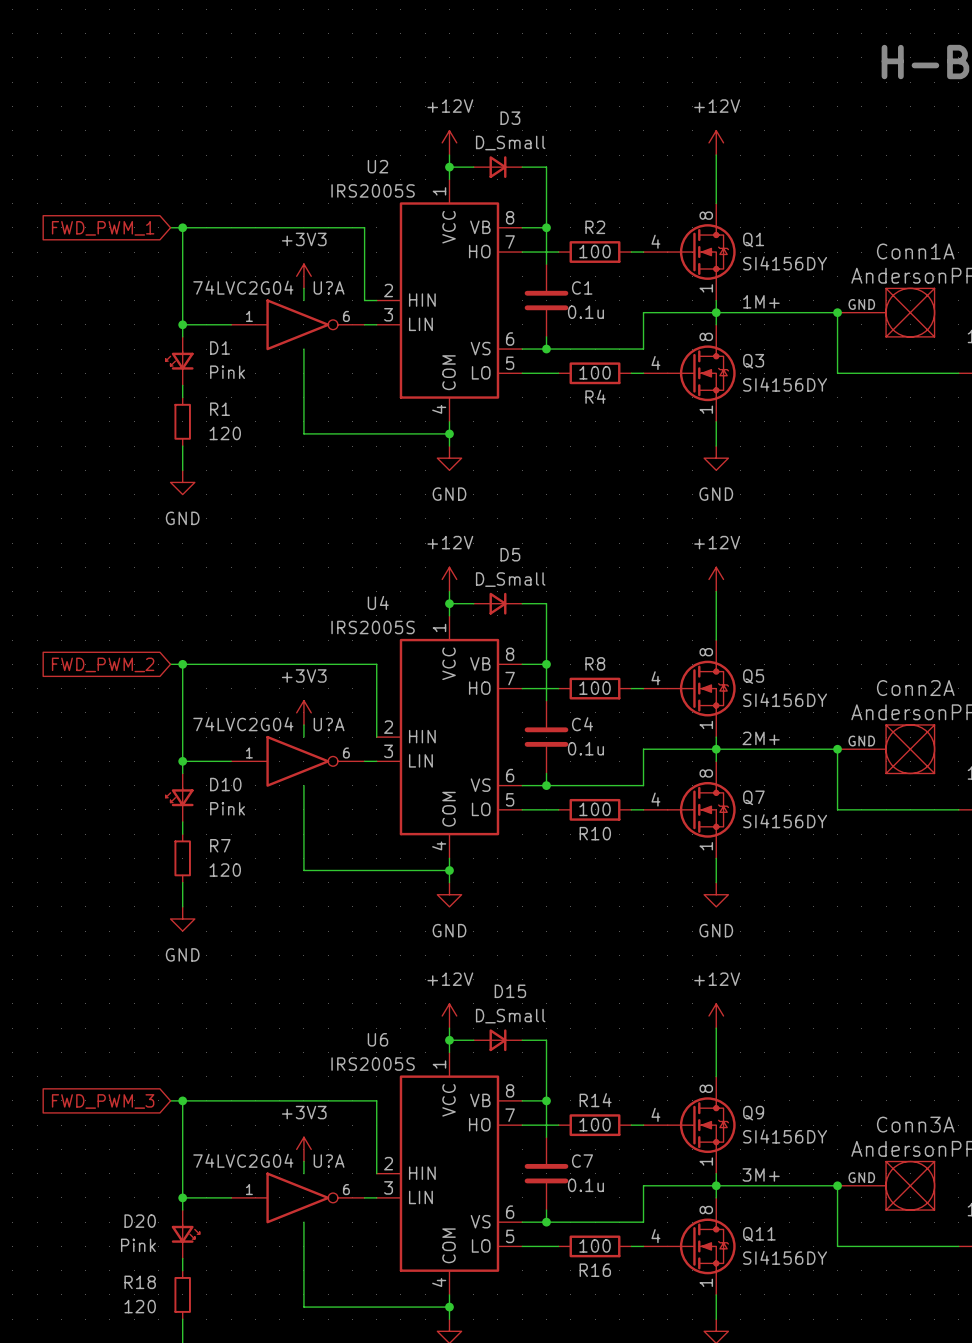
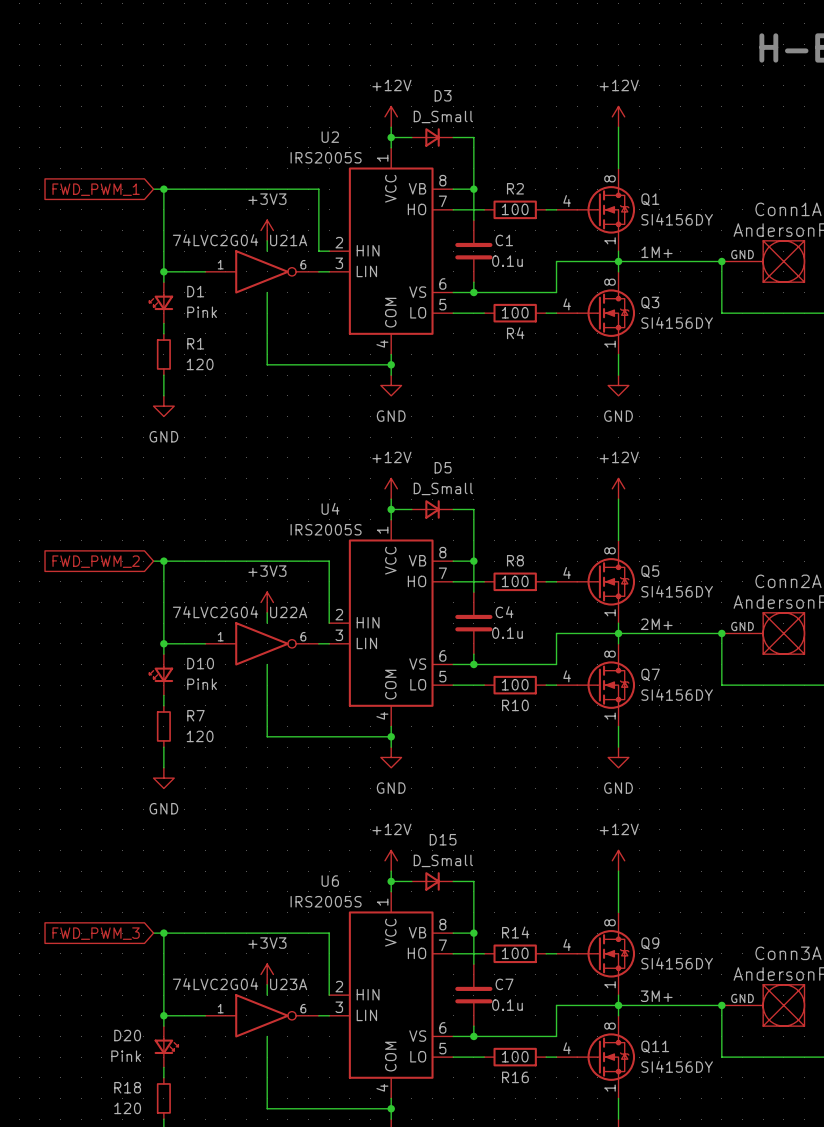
U?A name: U?A (329, 287) -> U21A (288, 240)
U?A name: U?A (329, 724) -> U22A (288, 612)
U?A name: U?A (329, 1161) -> U23A (288, 984)

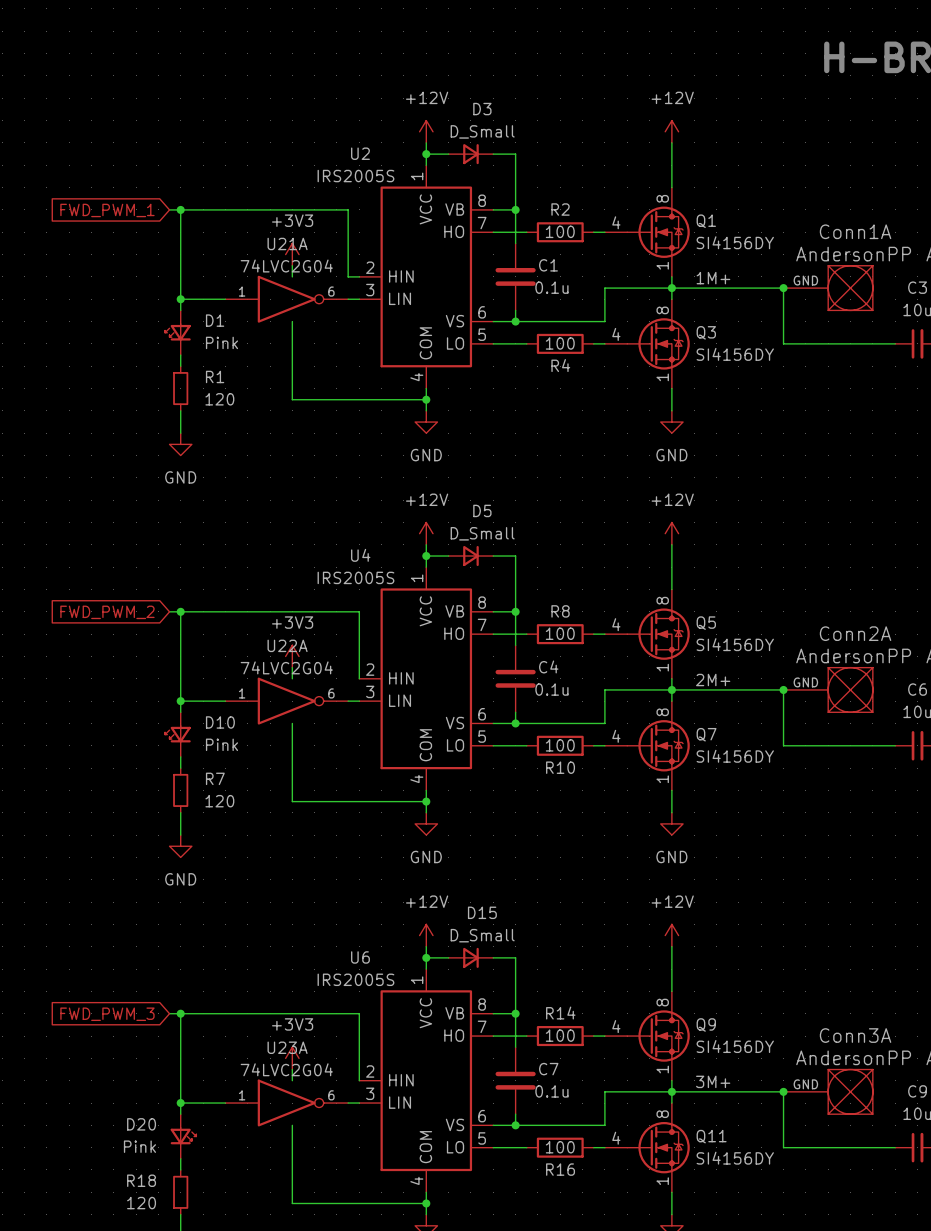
U21A value position: 74LVC2G04 (215, 240) -> 74LVC2G04 (286, 266)
U21A name position: U21A (288, 240) -> U21A (287, 243)
U22A value position: 74LVC2G04 (215, 612) -> 74LVC2G04 (286, 667)
U22A name position: U22A (288, 612) -> U22A (287, 645)
U23A value position: 74LVC2G04 (215, 984) -> 74LVC2G04 (286, 1069)
U23A name position: U23A (288, 984) -> U23A (287, 1047)

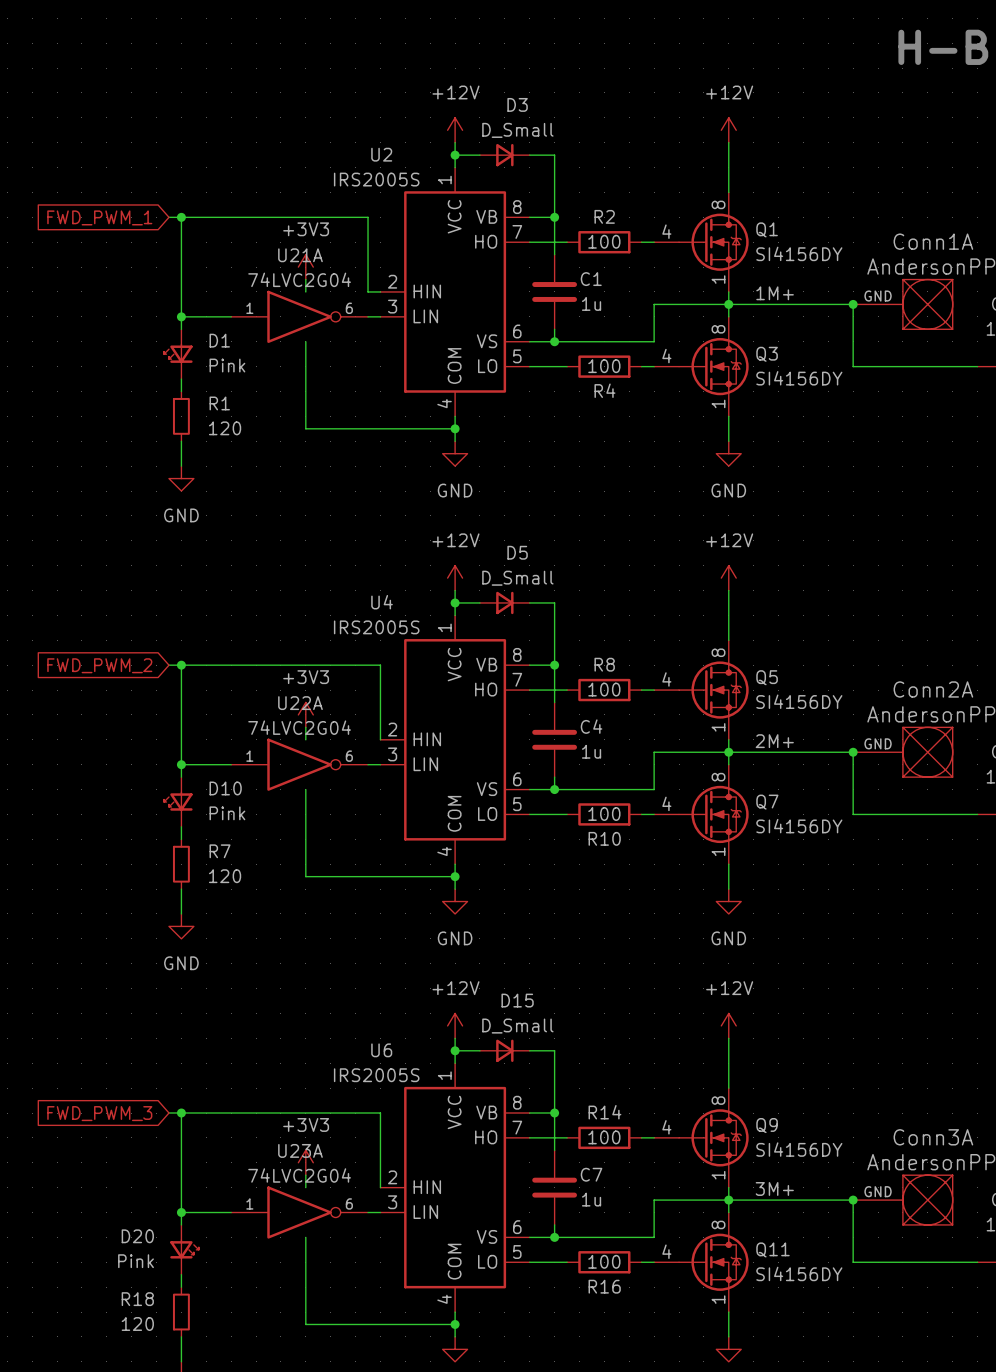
C1 value: 0.1u (551, 287) -> 1u (591, 303)
C4 value: 0.1u (551, 689) -> 1u (591, 751)
C7 value: 0.1u (551, 1091) -> 1u (591, 1199)

